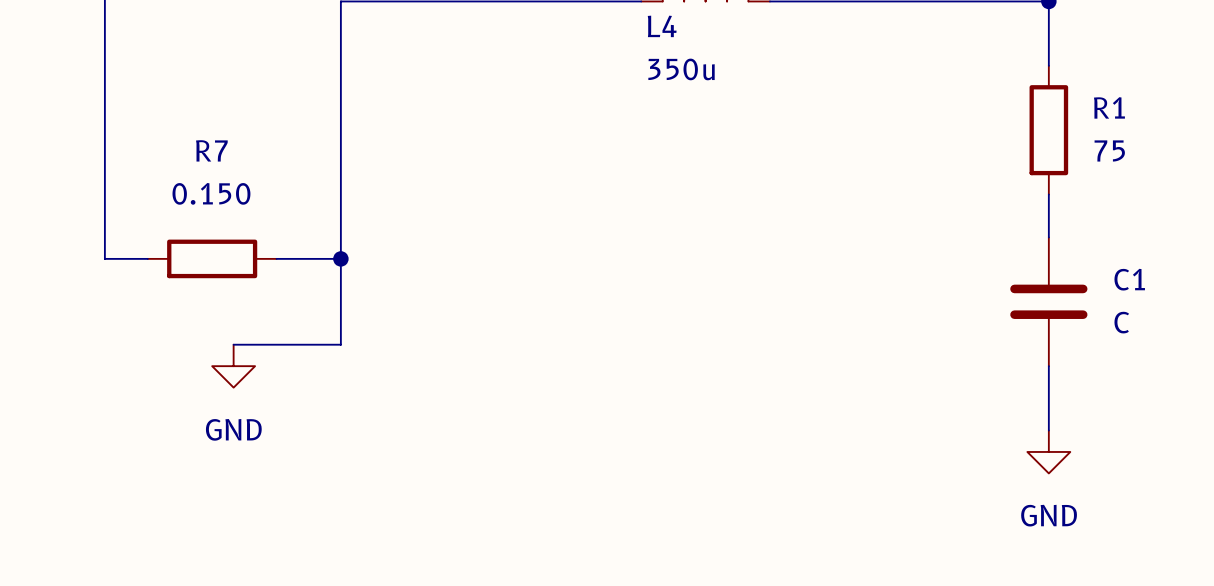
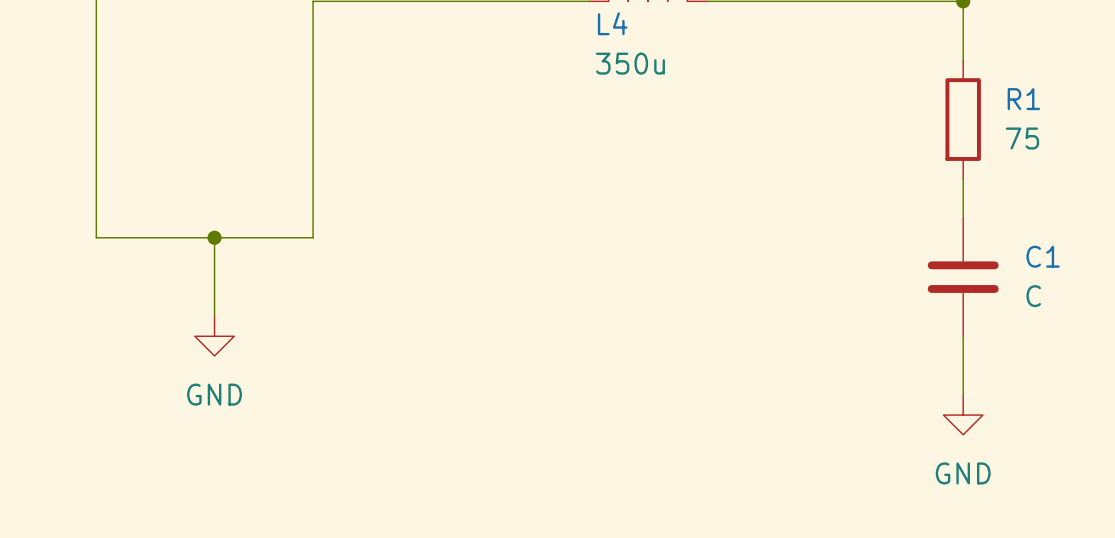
wire: none -> (135, 237) (253, 237)
R7: 0.150 (212, 258) -> none
junction: none -> (214, 237)
wire: (340, 258) (340, 344) (233, 344) -> (214, 237) (214, 316)
junction: (340, 258) -> none

